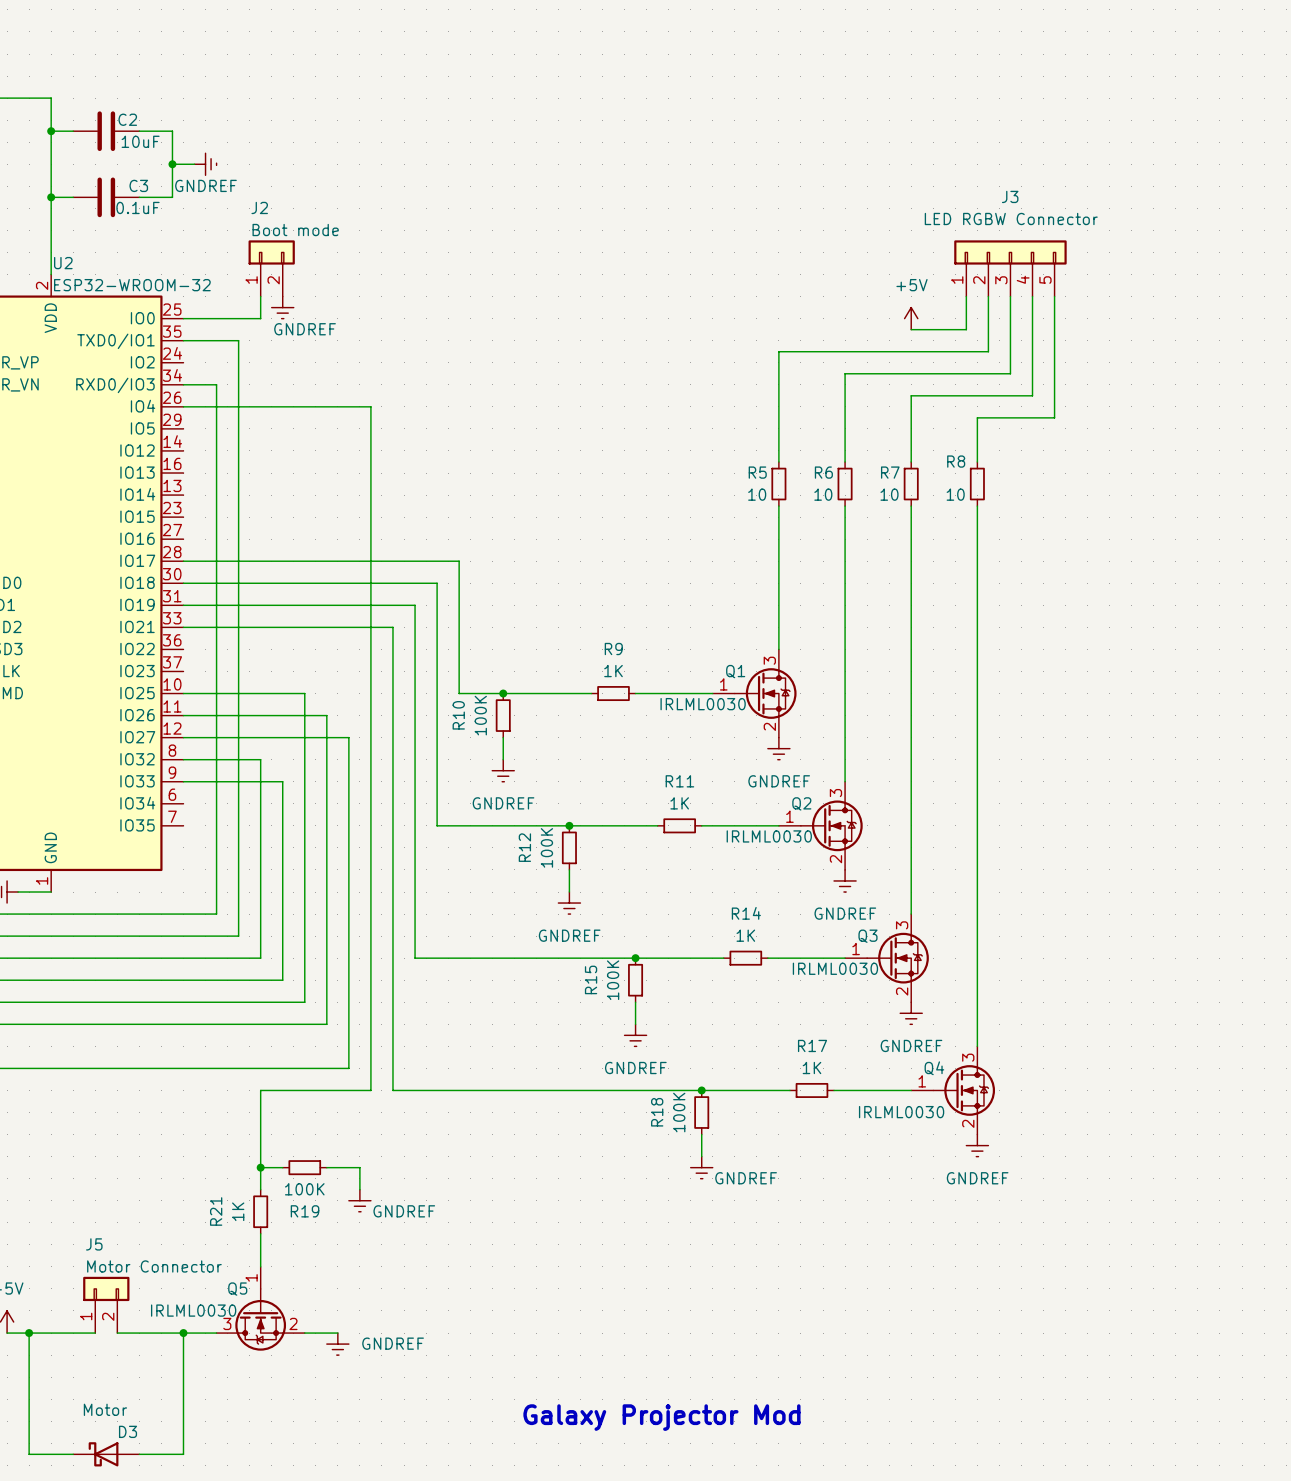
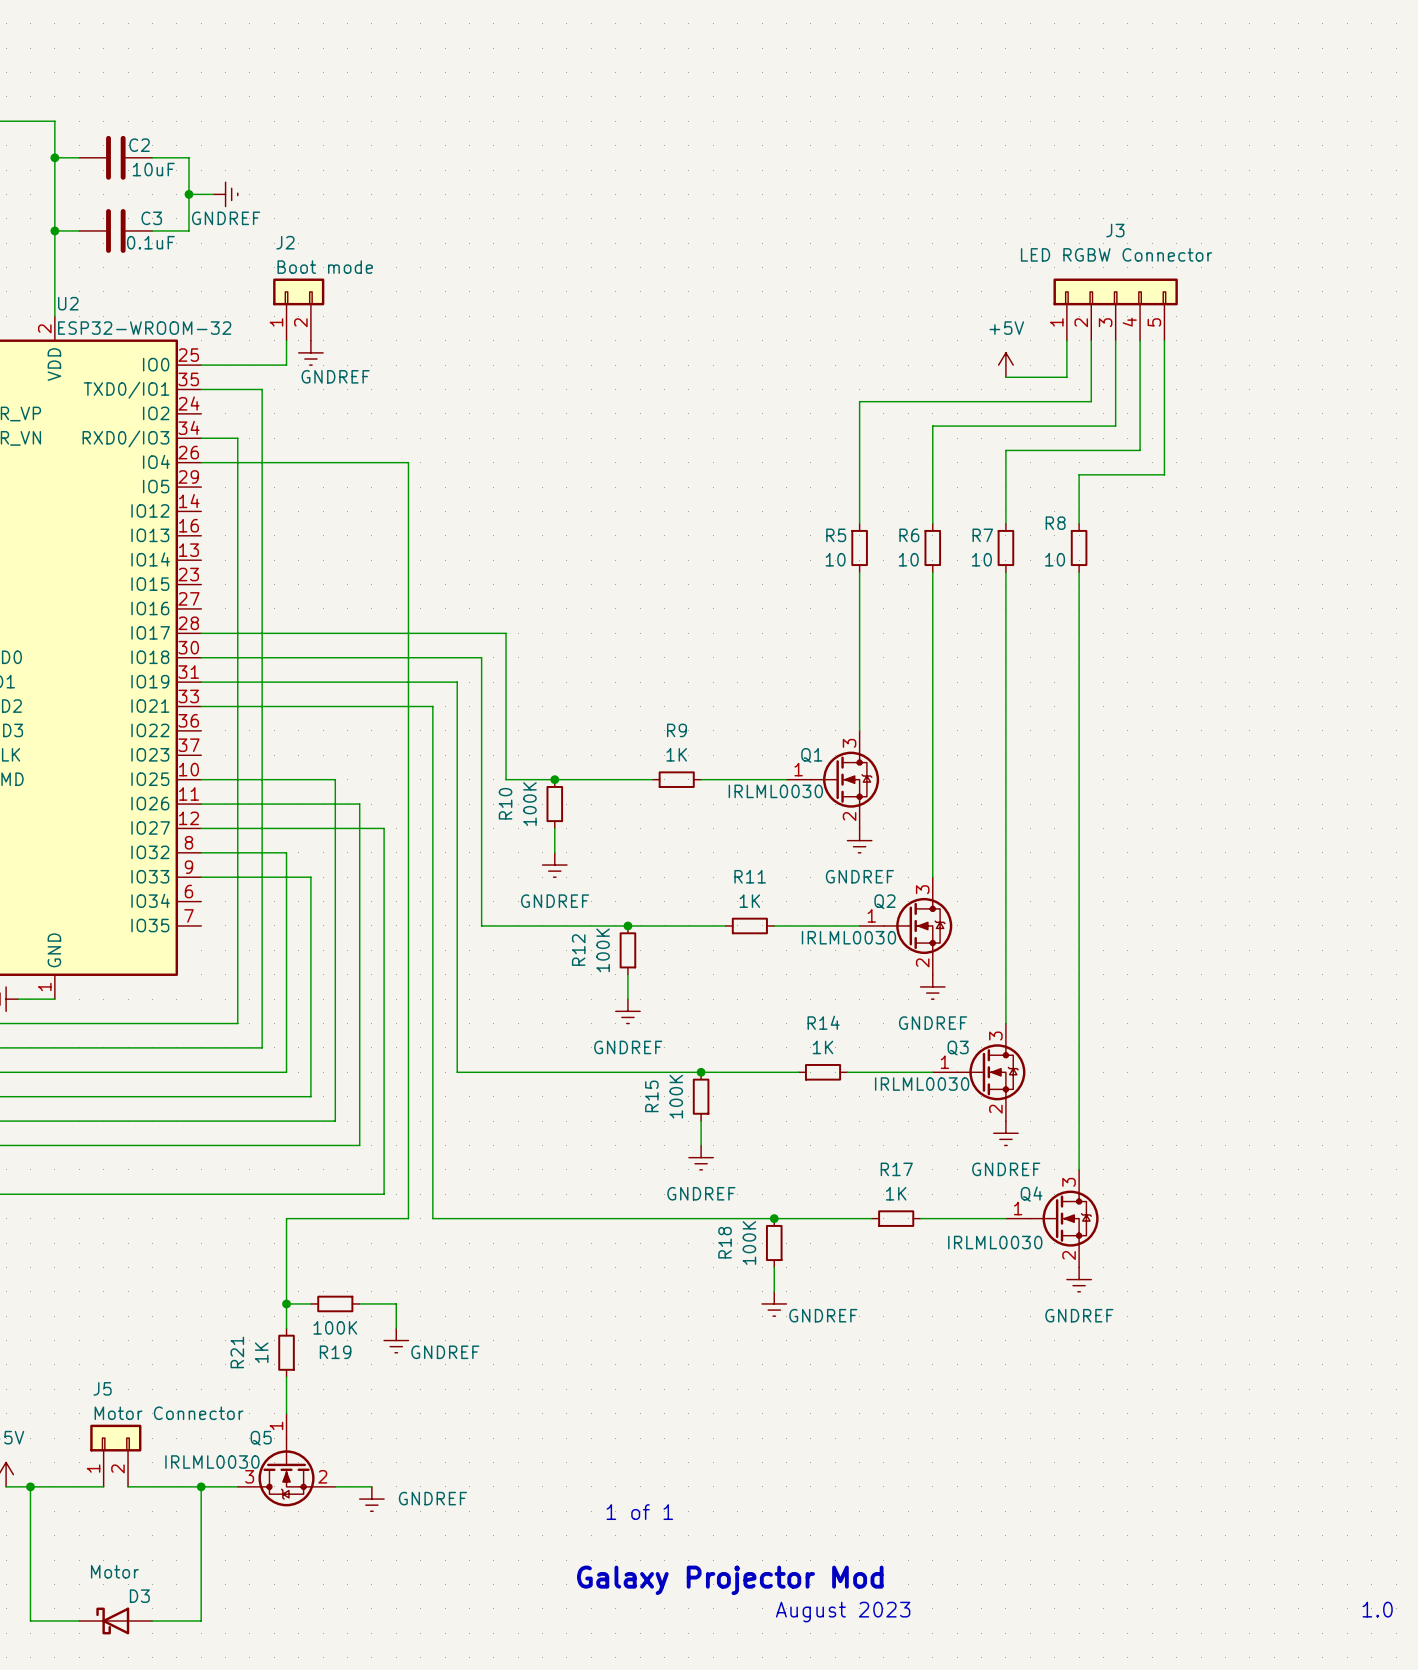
text: none -> 1 of 1 (639, 1512)
text: none -> 1.0 (1377, 1609)
text: none -> August 2023 (843, 1612)

